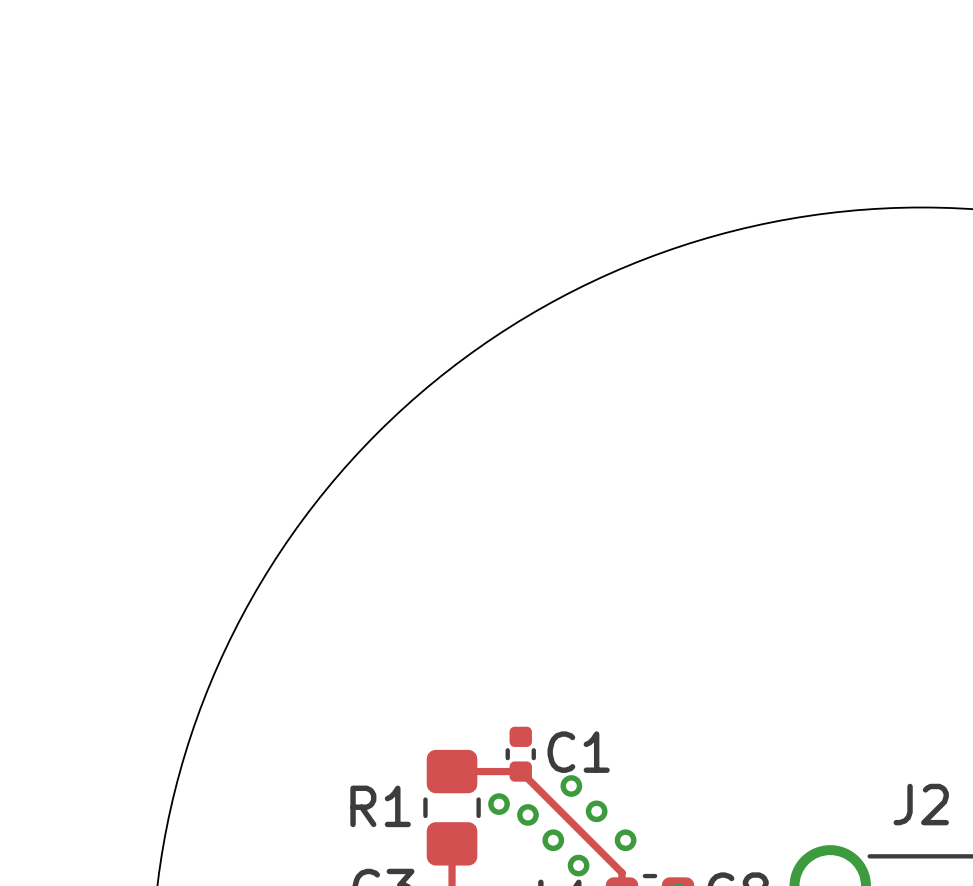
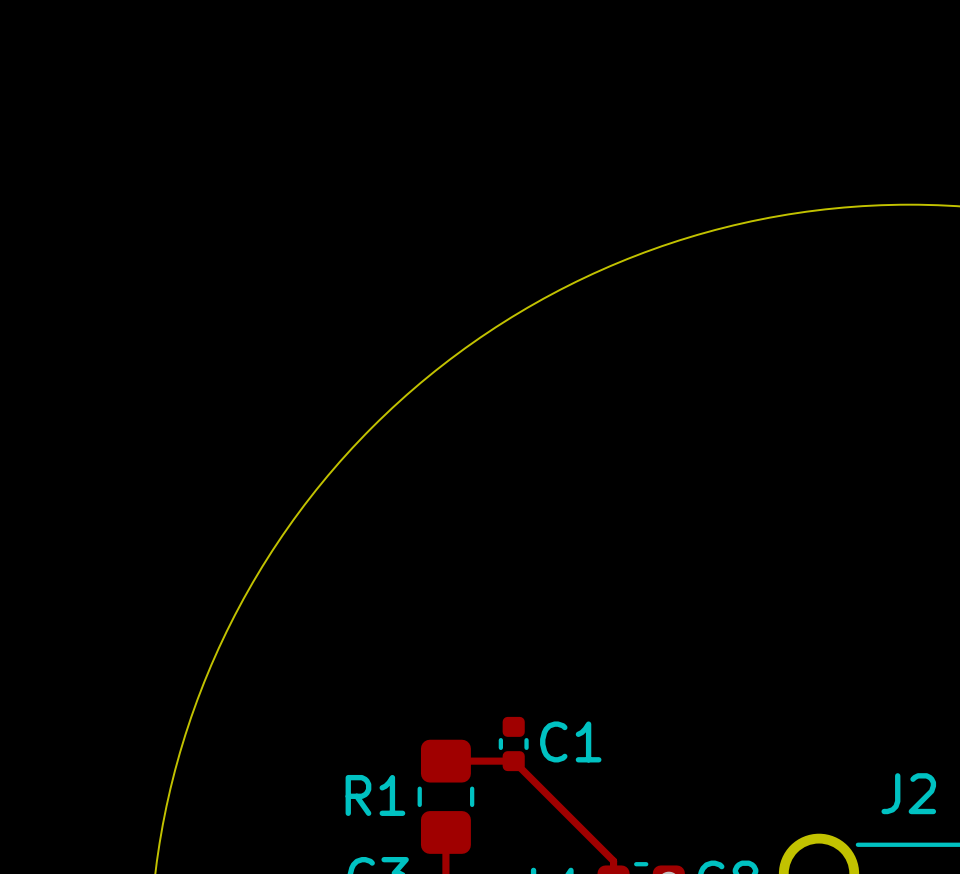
via: (571, 786) -> none
via: (499, 804) -> none
via: (596, 811) -> none
via: (527, 814) -> none
via: (553, 840) -> none
via: (625, 840) -> none
via: (578, 865) -> none

